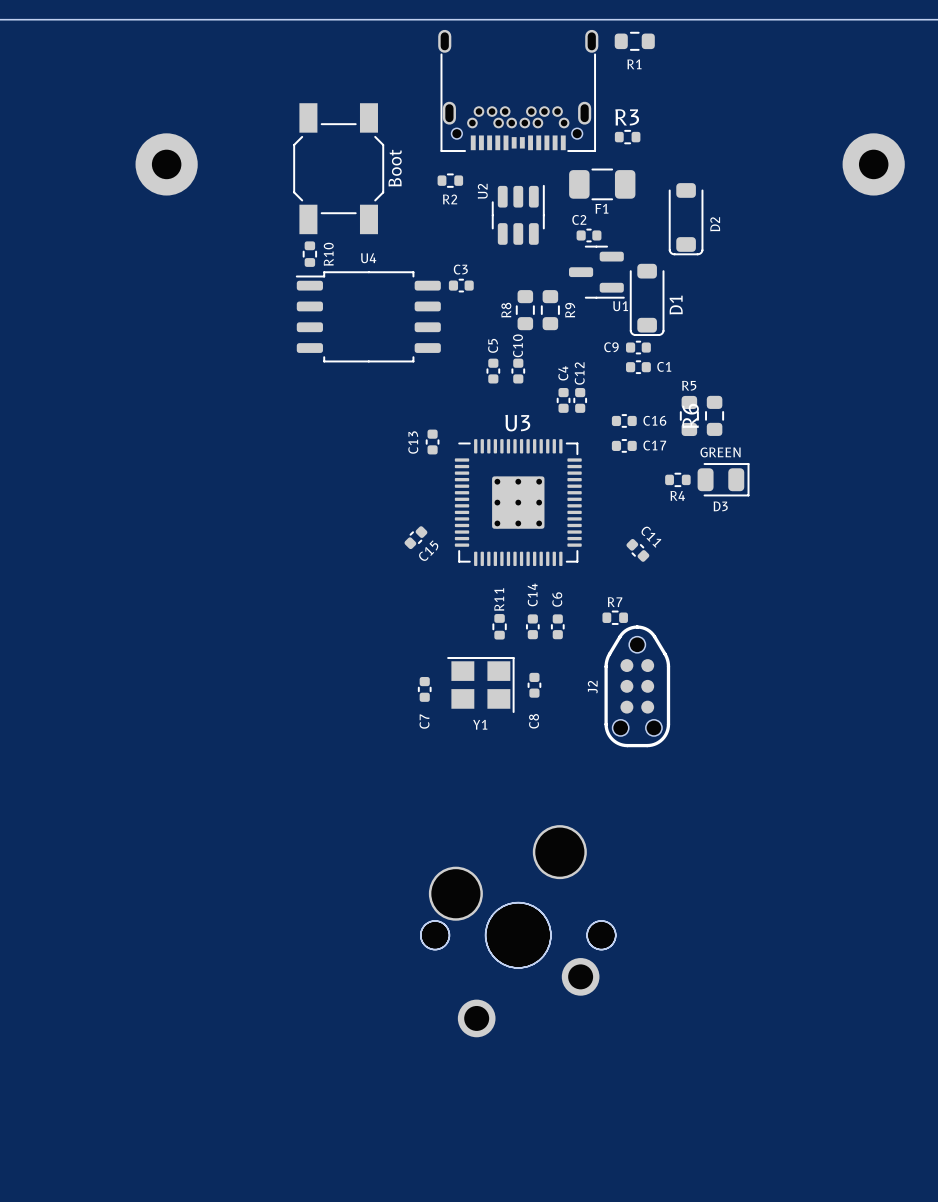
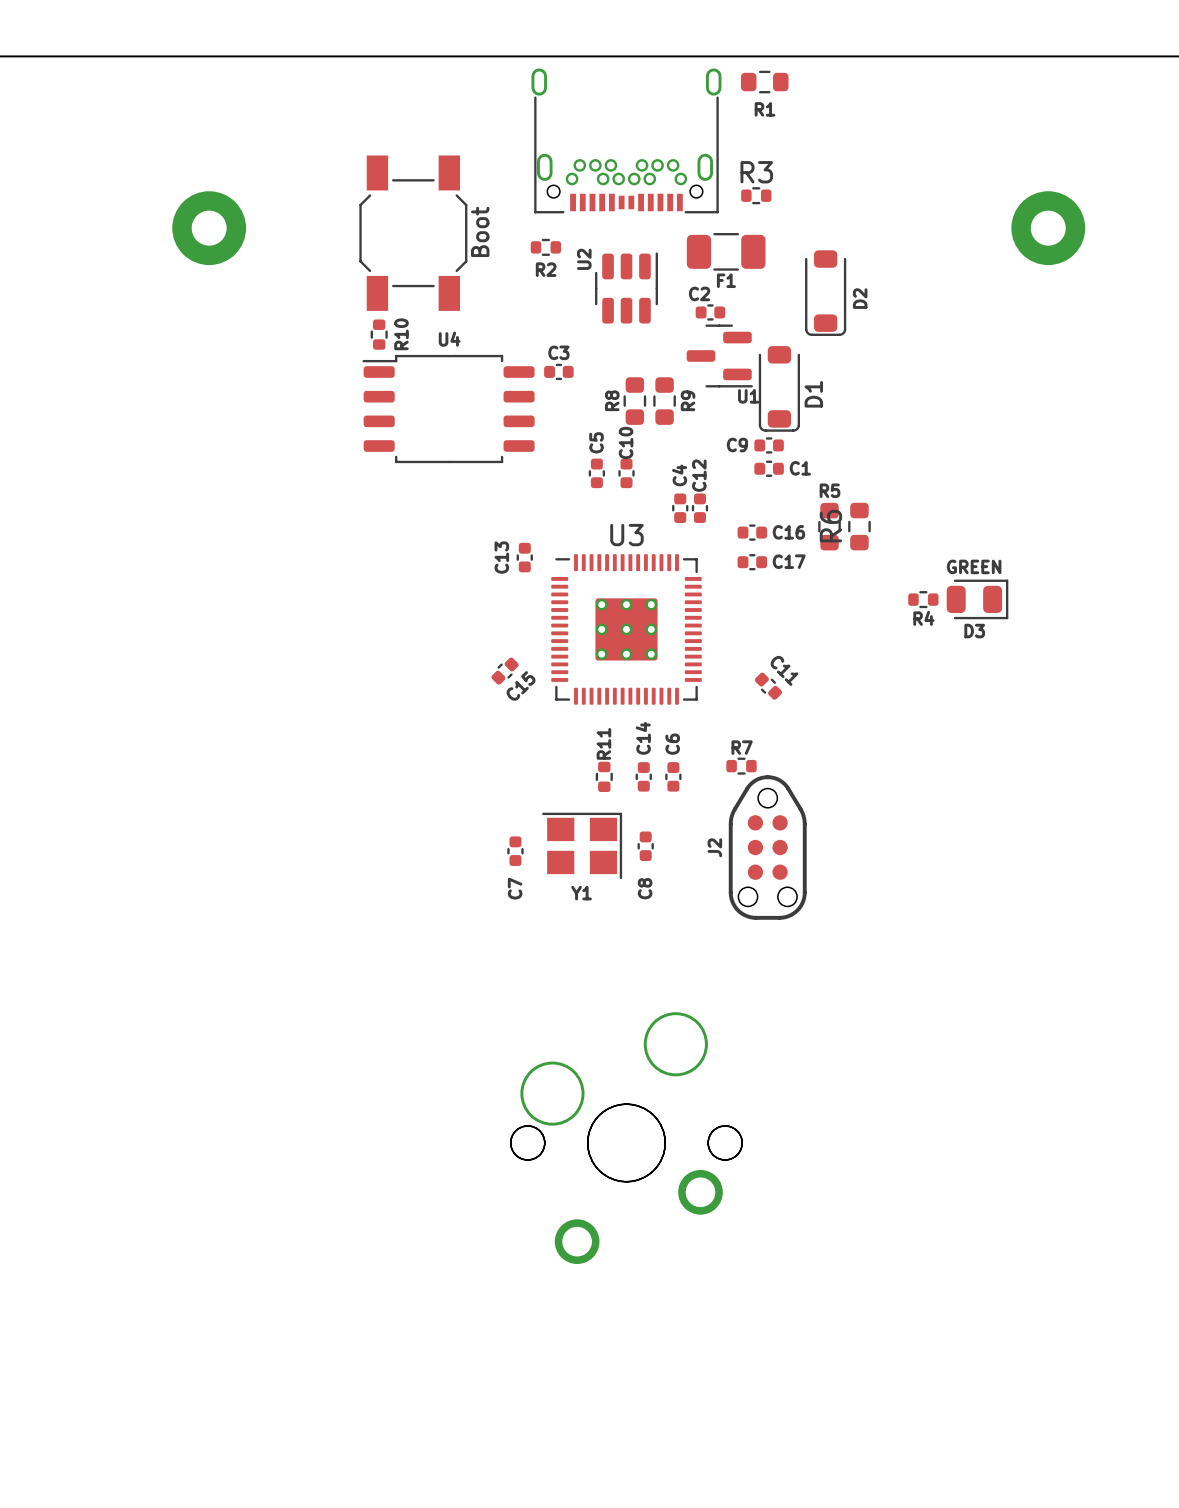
R4 position: (677, 479) -> (923, 599)
D3 position: (723, 479) -> (977, 599)

